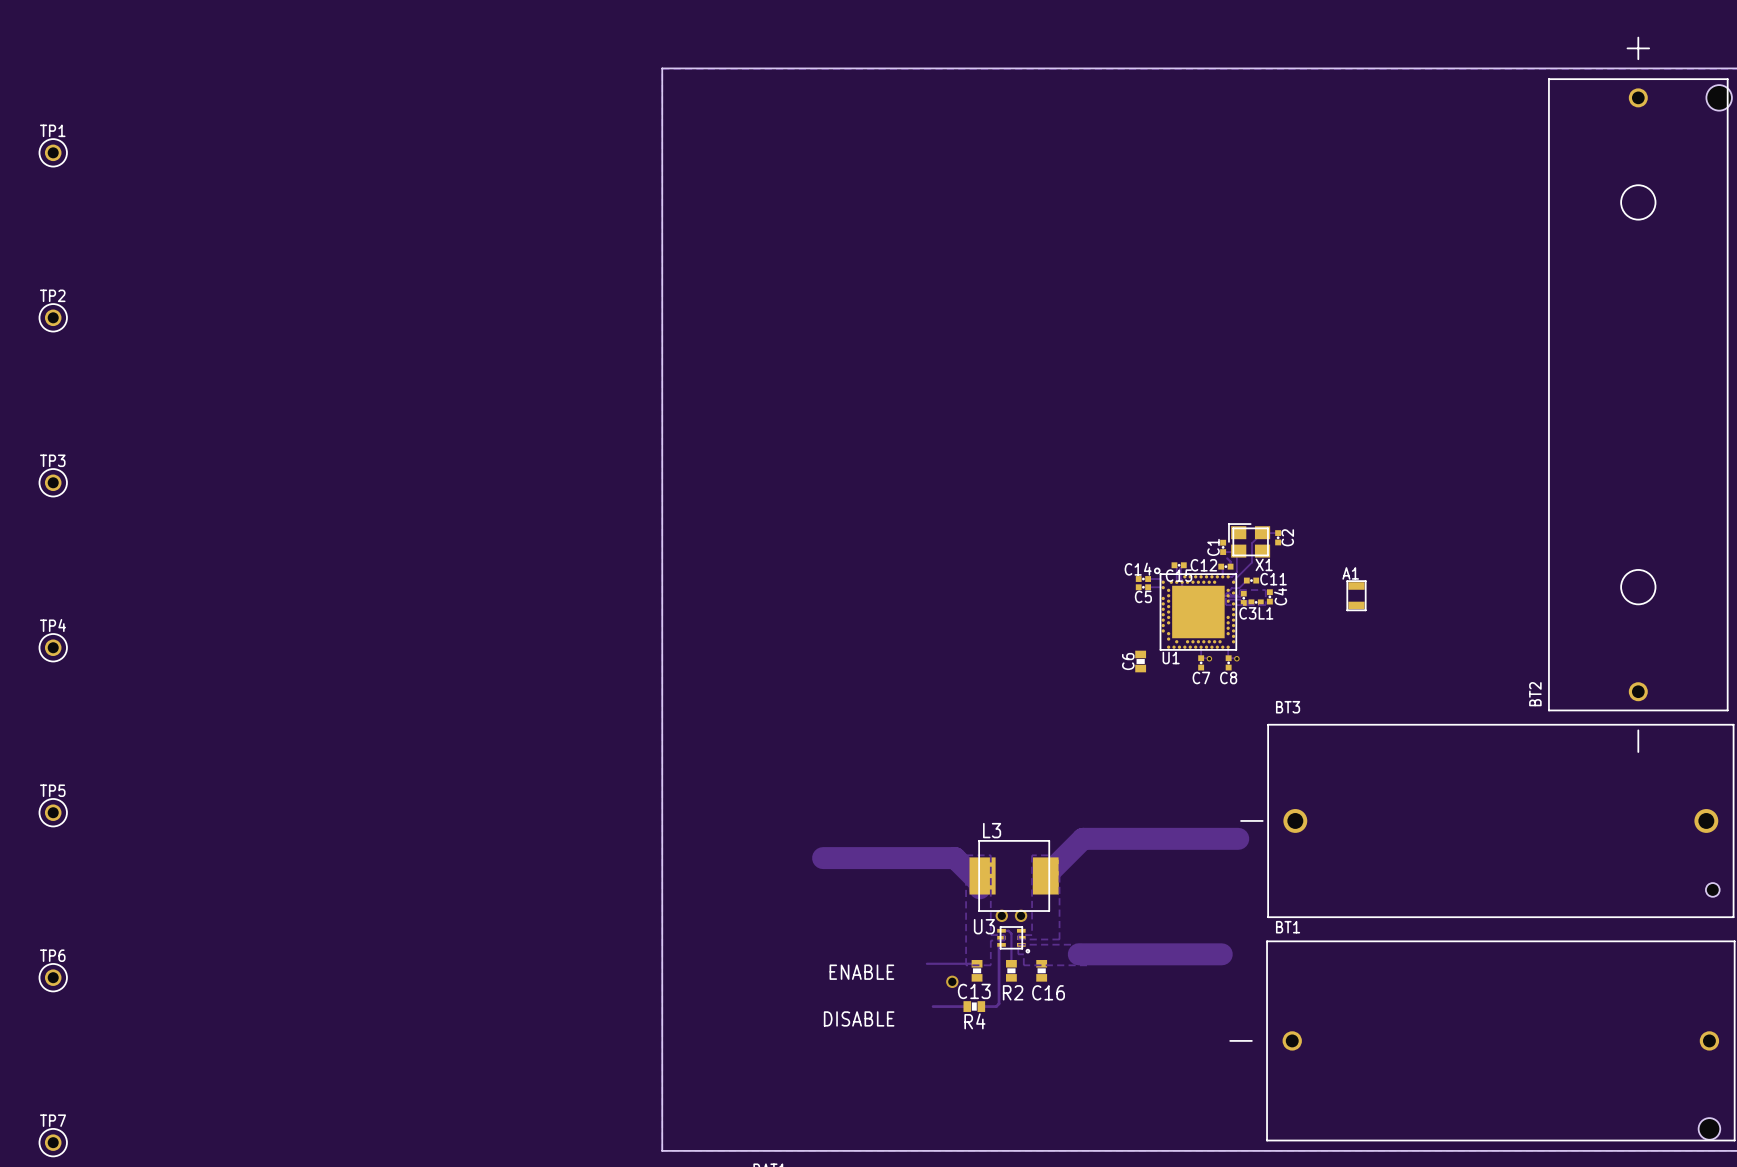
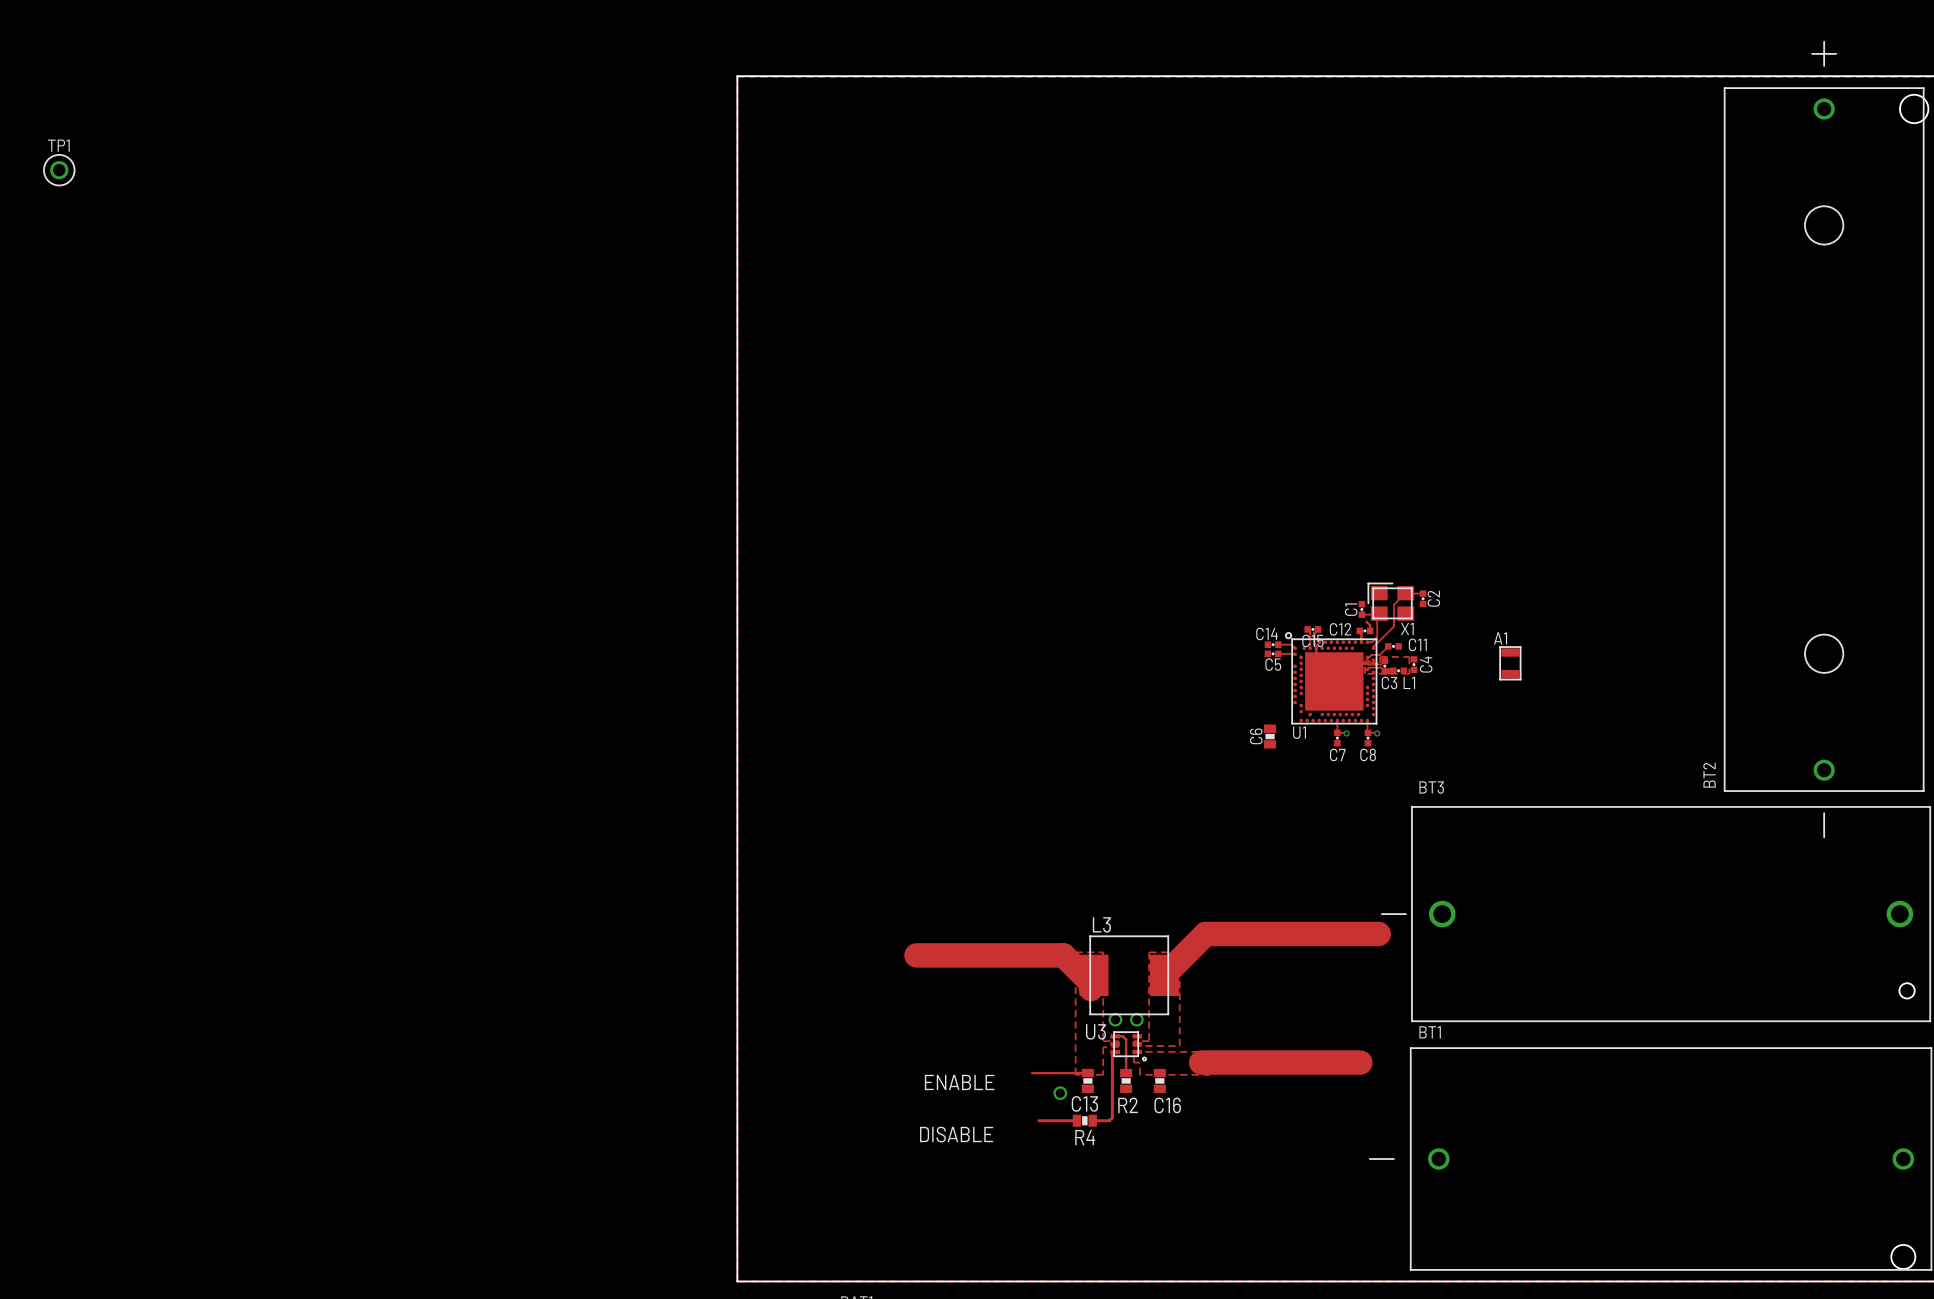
TP2: (53, 317) -> none
TP3: (53, 482) -> none
TP4: (53, 647) -> none
TP5: (53, 812) -> none
TP6: (53, 977) -> none
TP7: (53, 1142) -> none

